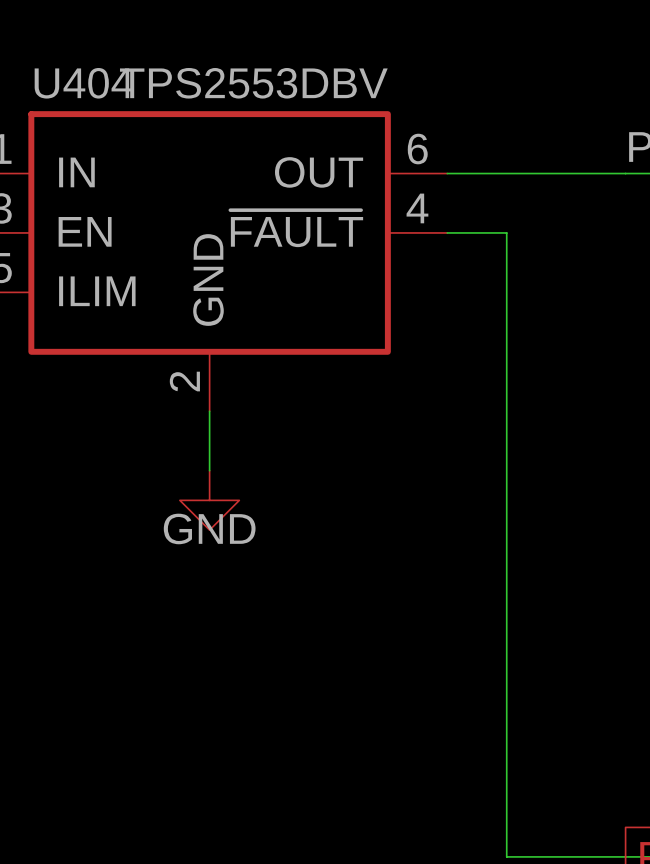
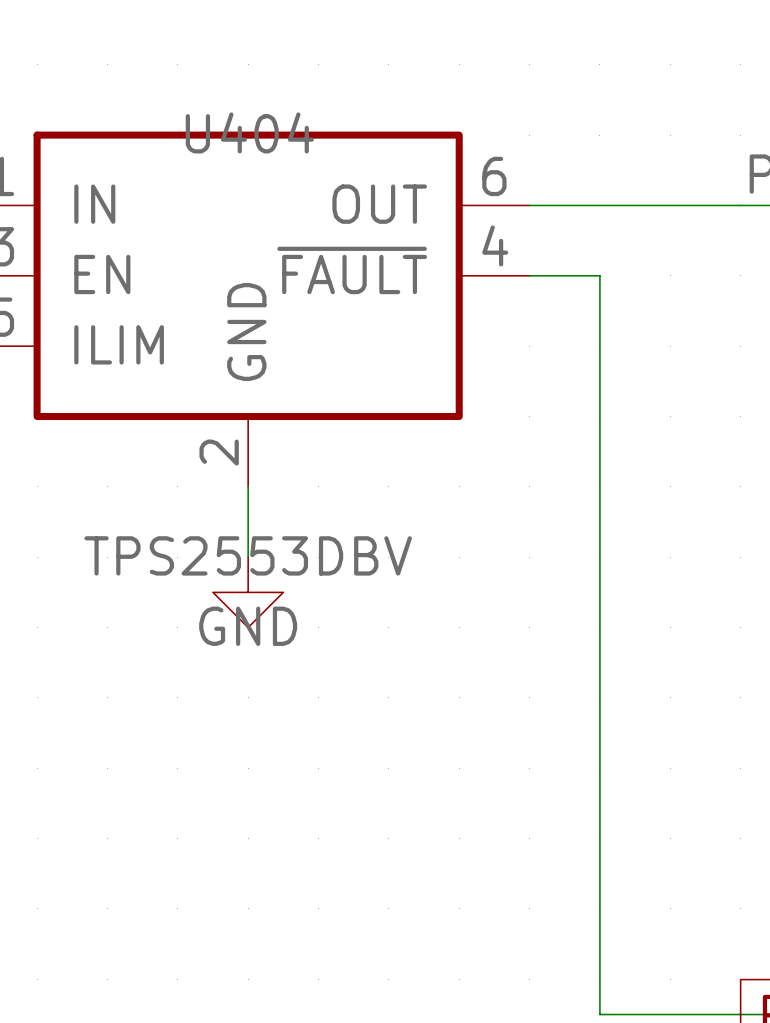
U404 name position: U404 (83, 83) -> U404 (249, 132)
U404 value position: TPS2553DBV (253, 83) -> TPS2553DBV (248, 555)

